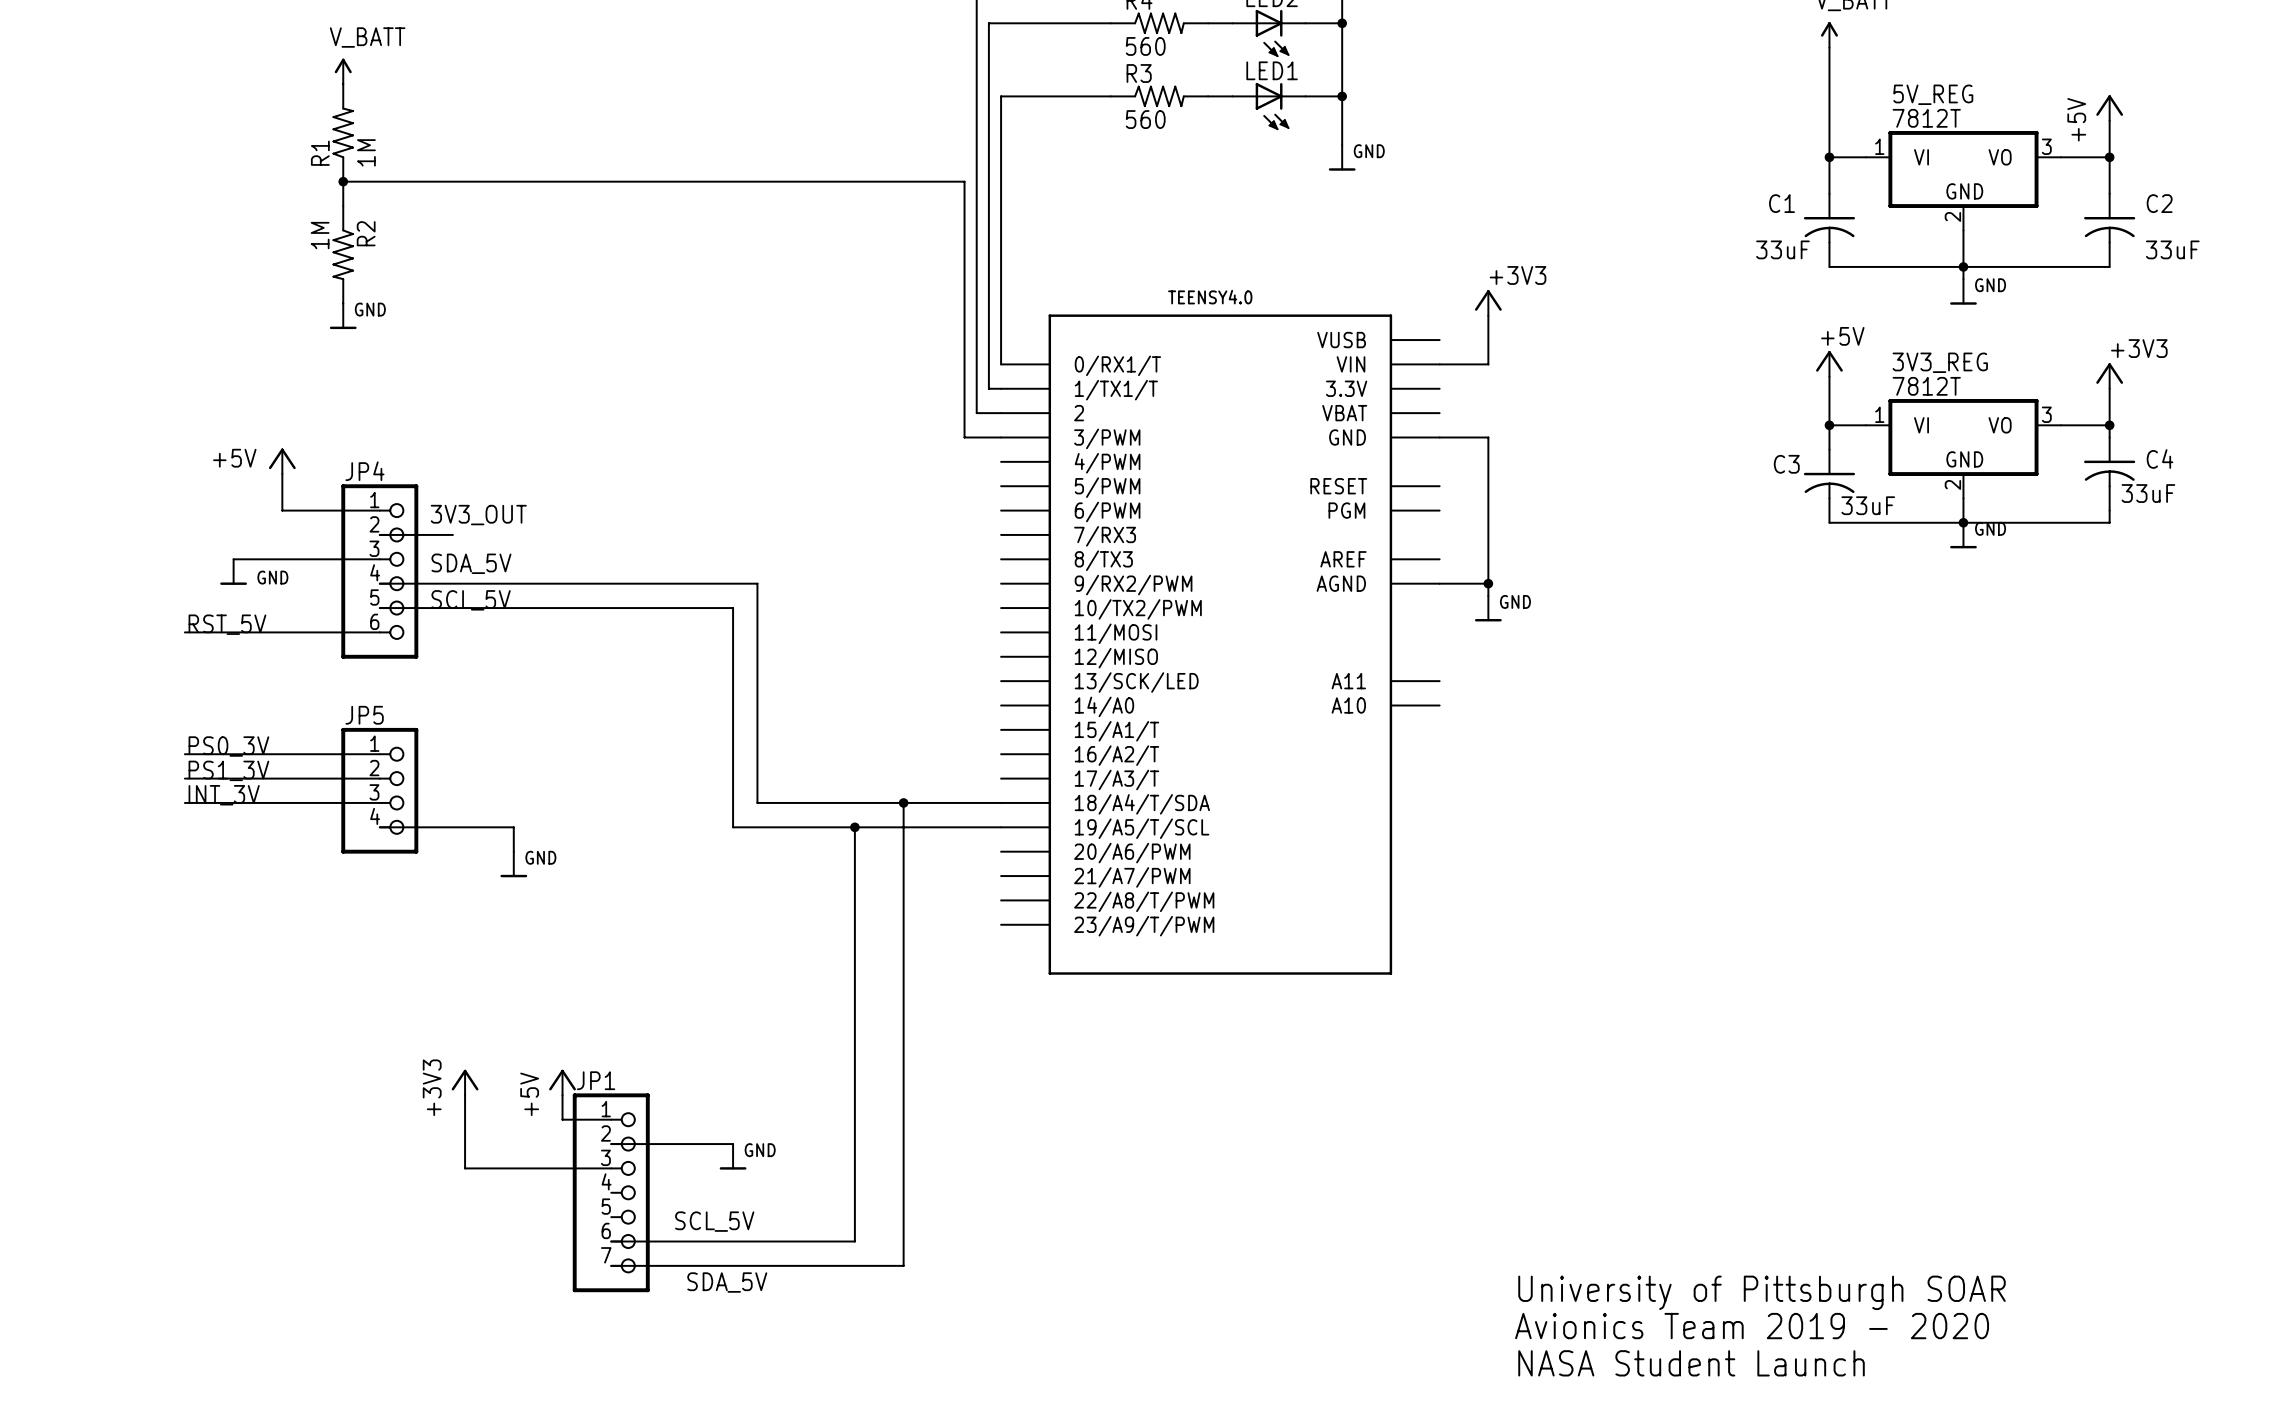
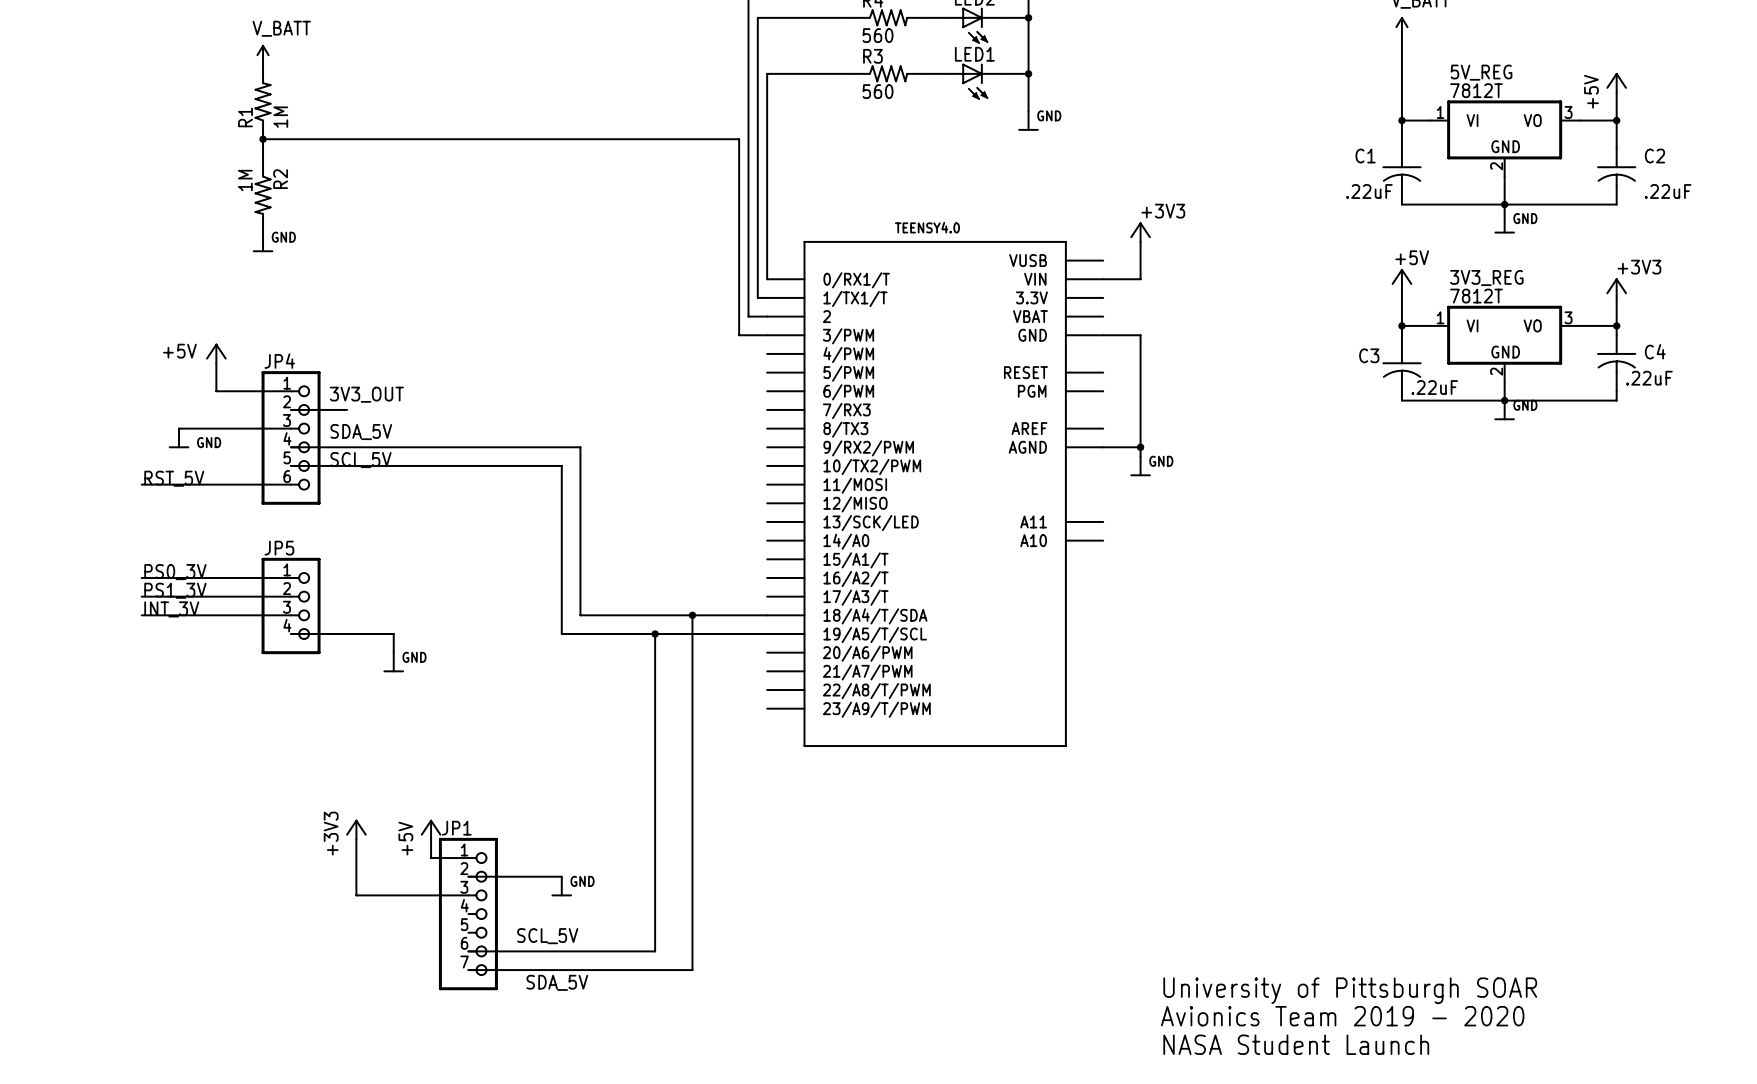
C1 value: 33uF (1782, 249) -> .22uF (1369, 191)
C2 value: 33uF (2172, 249) -> .22uF (1668, 191)
C4 value: 33uF (2148, 493) -> .22uF (1649, 378)
C3 value: 33uF (1868, 505) -> .22uF (1434, 387)

